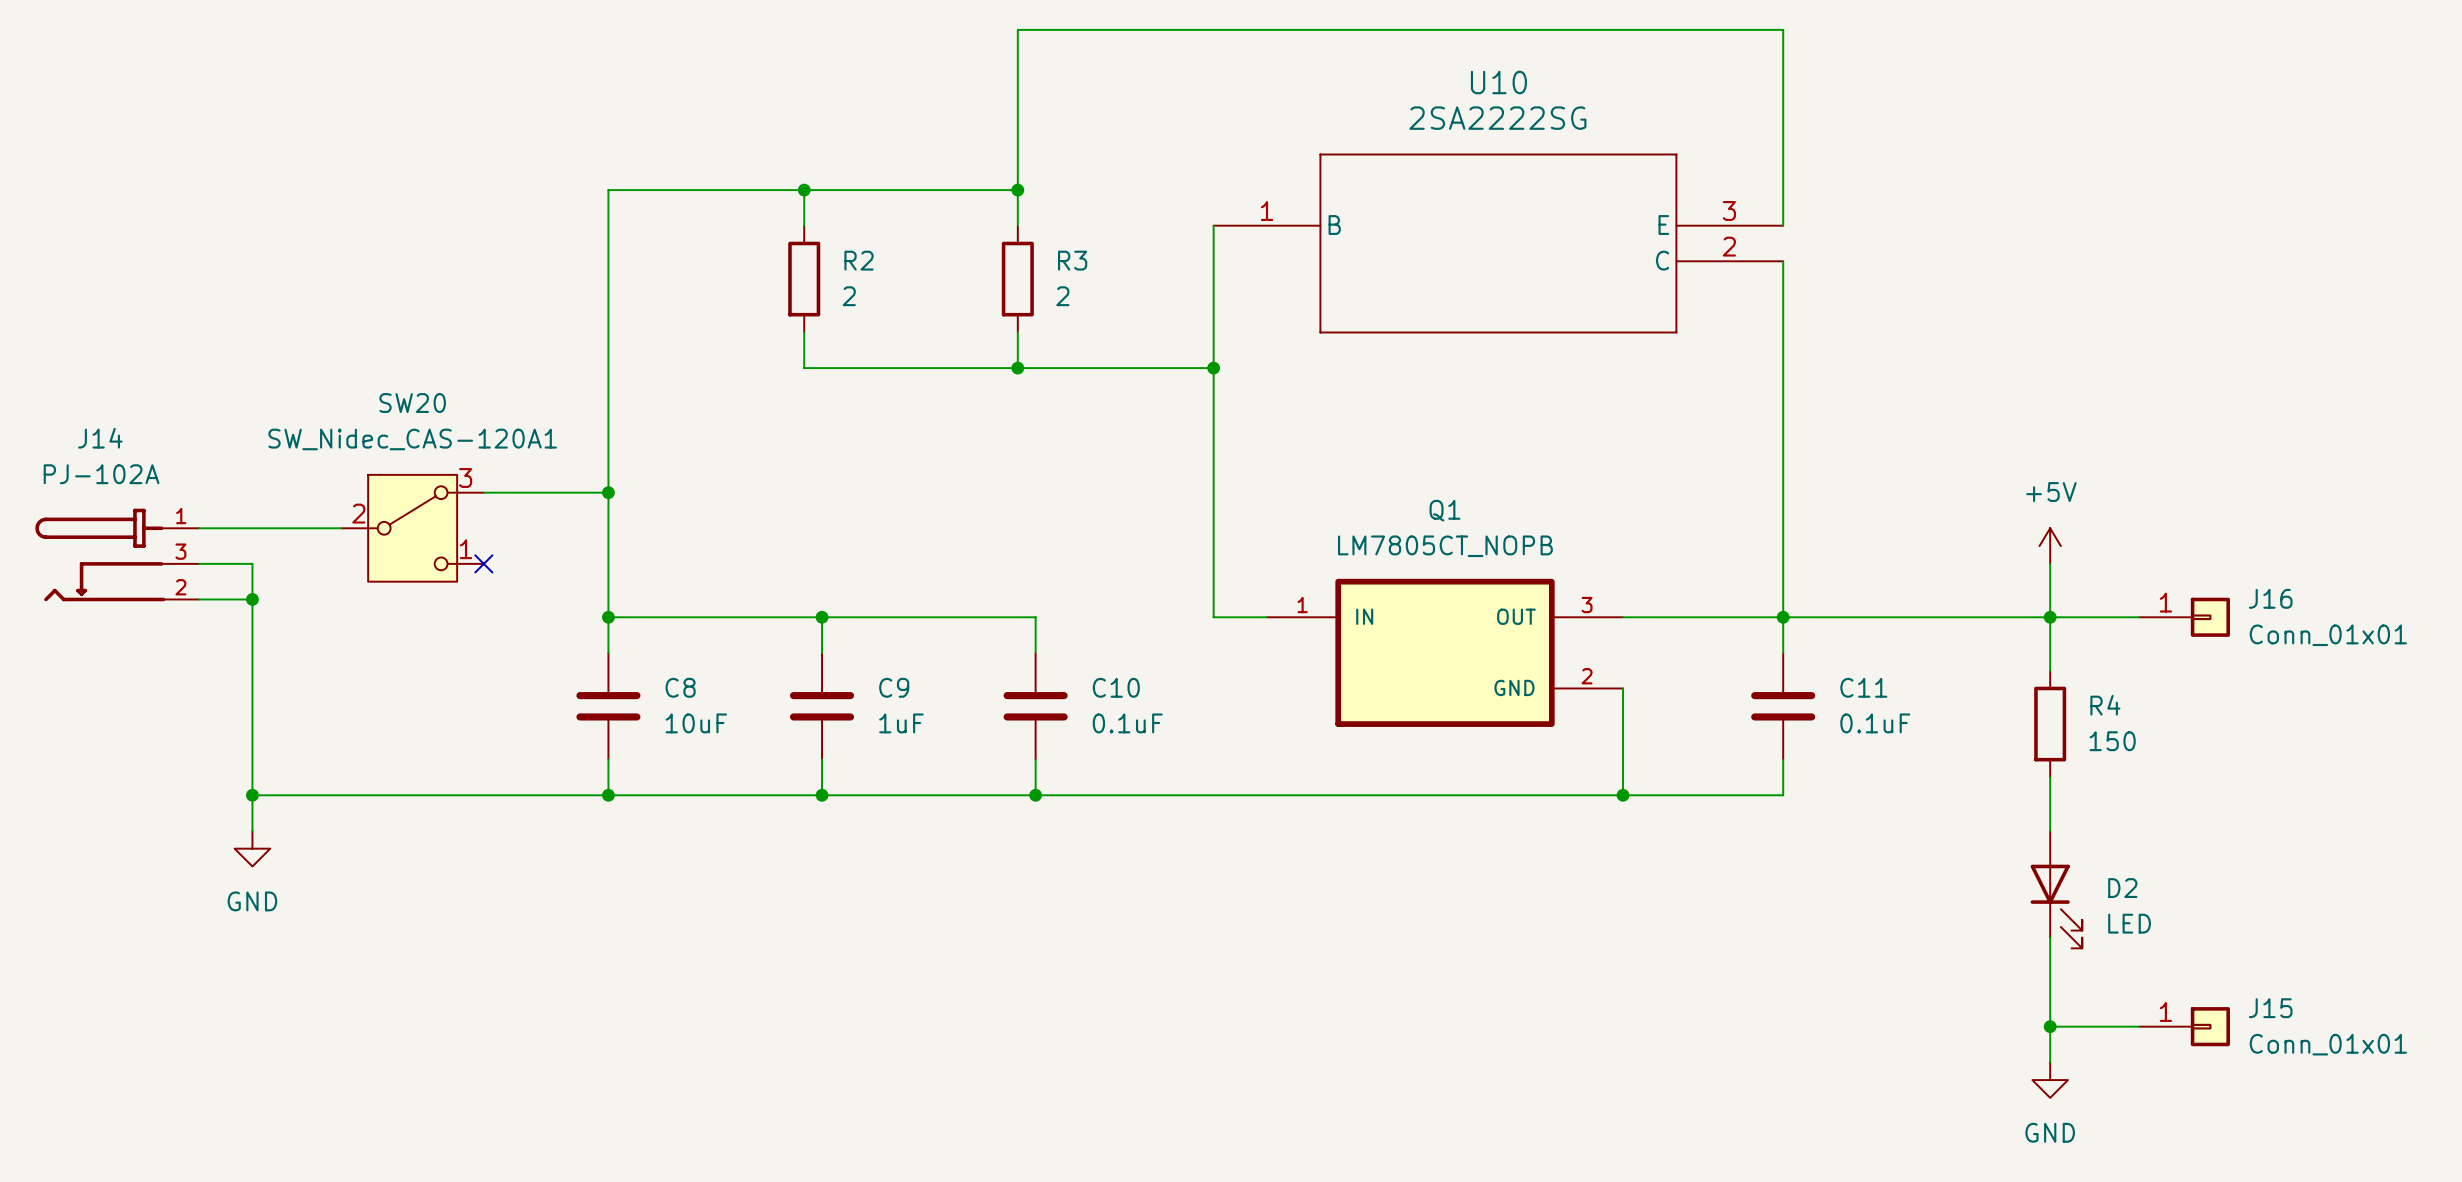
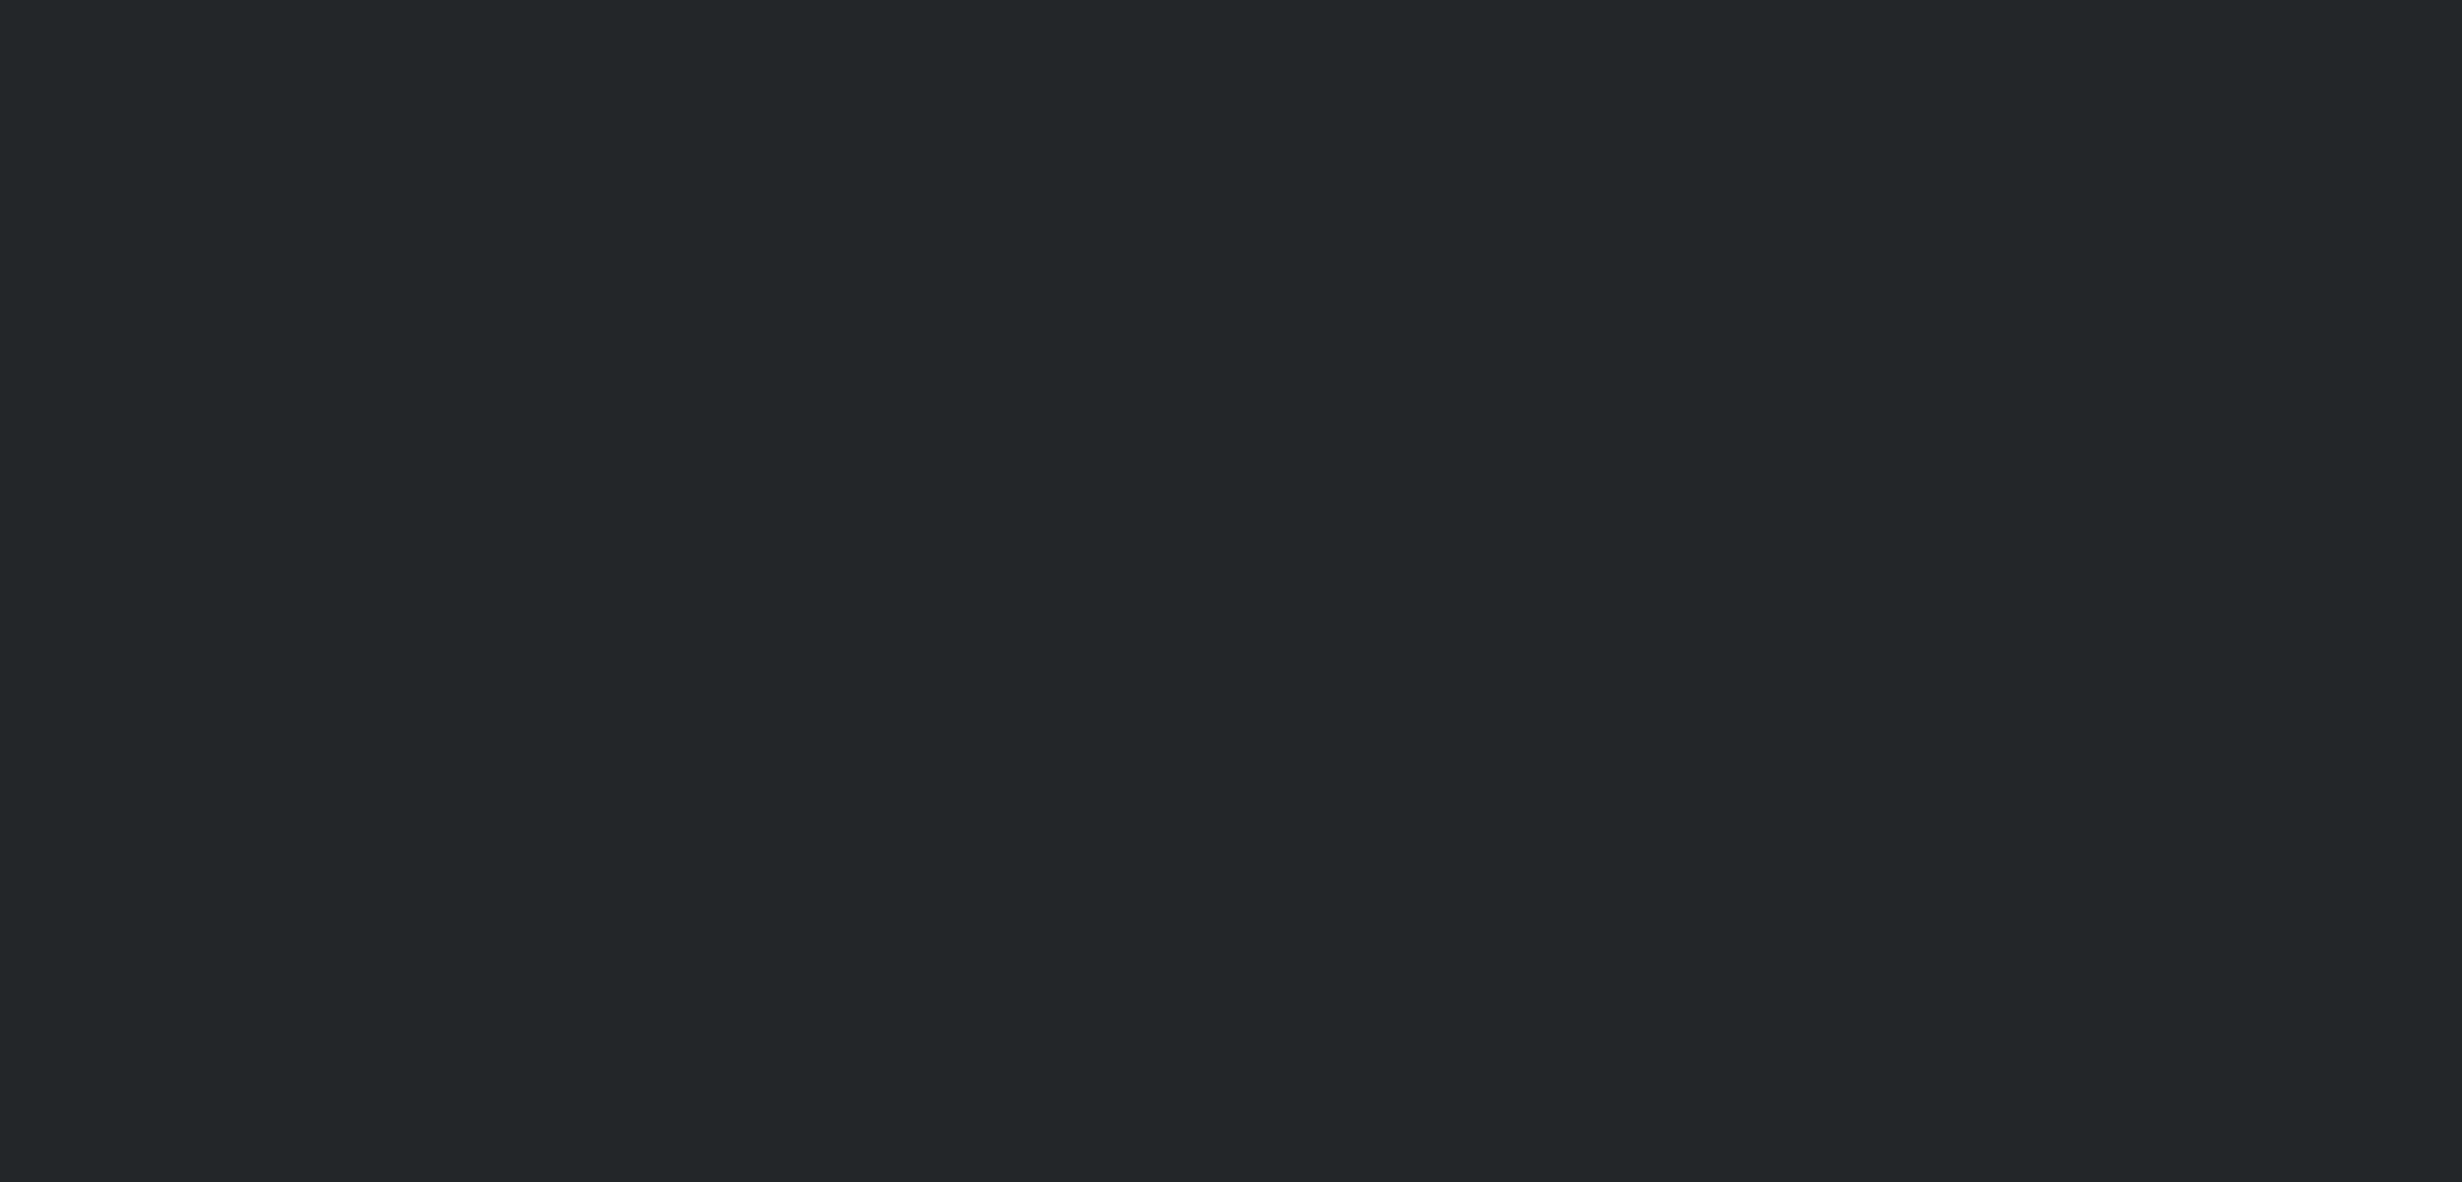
wire: (804, 190) (804, 225) -> none
junction: (804, 190) -> none
wire: (1017, 190) (608, 190) (608, 652) -> none
junction: (1017, 190) -> none
wire: (1017, 225) (1017, 29) (1783, 29) (1783, 225) -> none
wire: (1213, 225) (1213, 617) (1267, 617) -> none
U10: 2SA2222SG (1498, 243) -> none
wire: (1783, 261) (1783, 652) -> none
R2: 2 (804, 279) -> none
R3: 2 (1017, 279) -> none
wire: (804, 332) (804, 368) (1213, 368) -> none
wire: (1017, 332) (1017, 368) -> none
junction: (1017, 368) -> none
junction: (1213, 368) -> none
wire: (483, 492) (608, 492) -> none
junction: (608, 492) -> none
wire: (199, 528) (341, 528) -> none
SW20: SW_Nidec_CAS-120A1 (412, 528) -> none
power symbol: +5V (2050, 546) -> none
J14: PJ-102A (117, 554) -> none
wire: (199, 563) (252, 563) (252, 830) -> none
no-connect mark: (483, 563) -> none
wire: (2050, 563) (2050, 670) -> none
wire: (199, 599) (252, 599) -> none
junction: (252, 599) -> none
wire: (608, 617) (1035, 617) (1035, 652) -> none
junction: (608, 617) -> none
wire: (822, 617) (822, 652) -> none
junction: (822, 617) -> none
wire: (1623, 617) (2139, 617) -> none
junction: (1783, 617) -> none
junction: (2050, 617) -> none
J16: Conn_01x01 (2184, 617) -> none
Q1: LM7805CT_NOPB (1445, 652) -> none
wire: (1623, 688) (1623, 795) -> none
C8: 10uF (608, 706) -> none
C9: 1uF (822, 706) -> none
C10: 0.1uF (1035, 706) -> none
C11: 0.1uF (1783, 706) -> none
R4: 150 (2050, 724) -> none
wire: (608, 759) (608, 795) -> none
wire: (822, 759) (822, 795) -> none
wire: (1035, 759) (1035, 795) -> none
wire: (1783, 759) (1783, 795) (252, 795) -> none
wire: (2050, 777) (2050, 830) -> none
junction: (252, 795) -> none
junction: (608, 795) -> none
junction: (822, 795) -> none
junction: (1035, 795) -> none
junction: (1623, 795) -> none
power symbol: GND (252, 848) -> none
D2: LED (2056, 889) -> none
wire: (2050, 937) (2050, 1062) -> none
wire: (2050, 1026) (2139, 1026) -> none
junction: (2050, 1026) -> none
J15: Conn_01x01 (2184, 1026) -> none
power symbol: GND (2050, 1080) -> none

